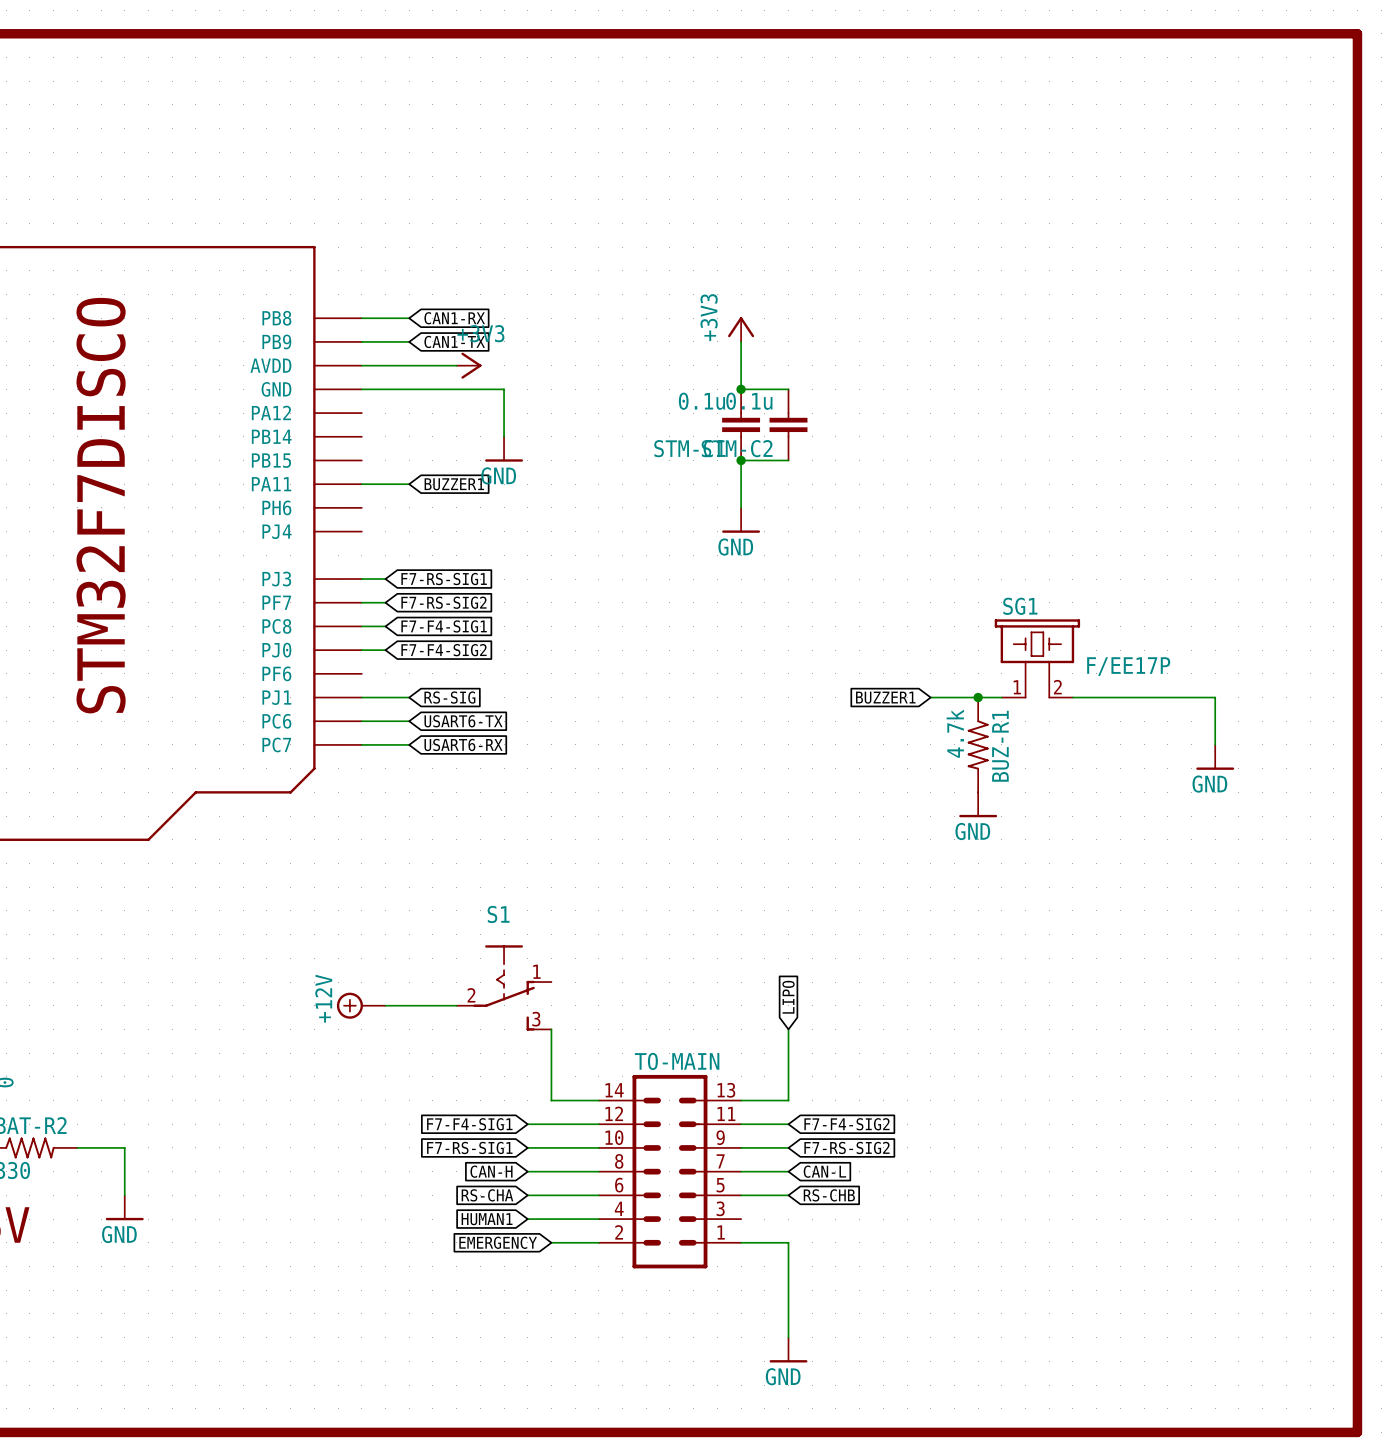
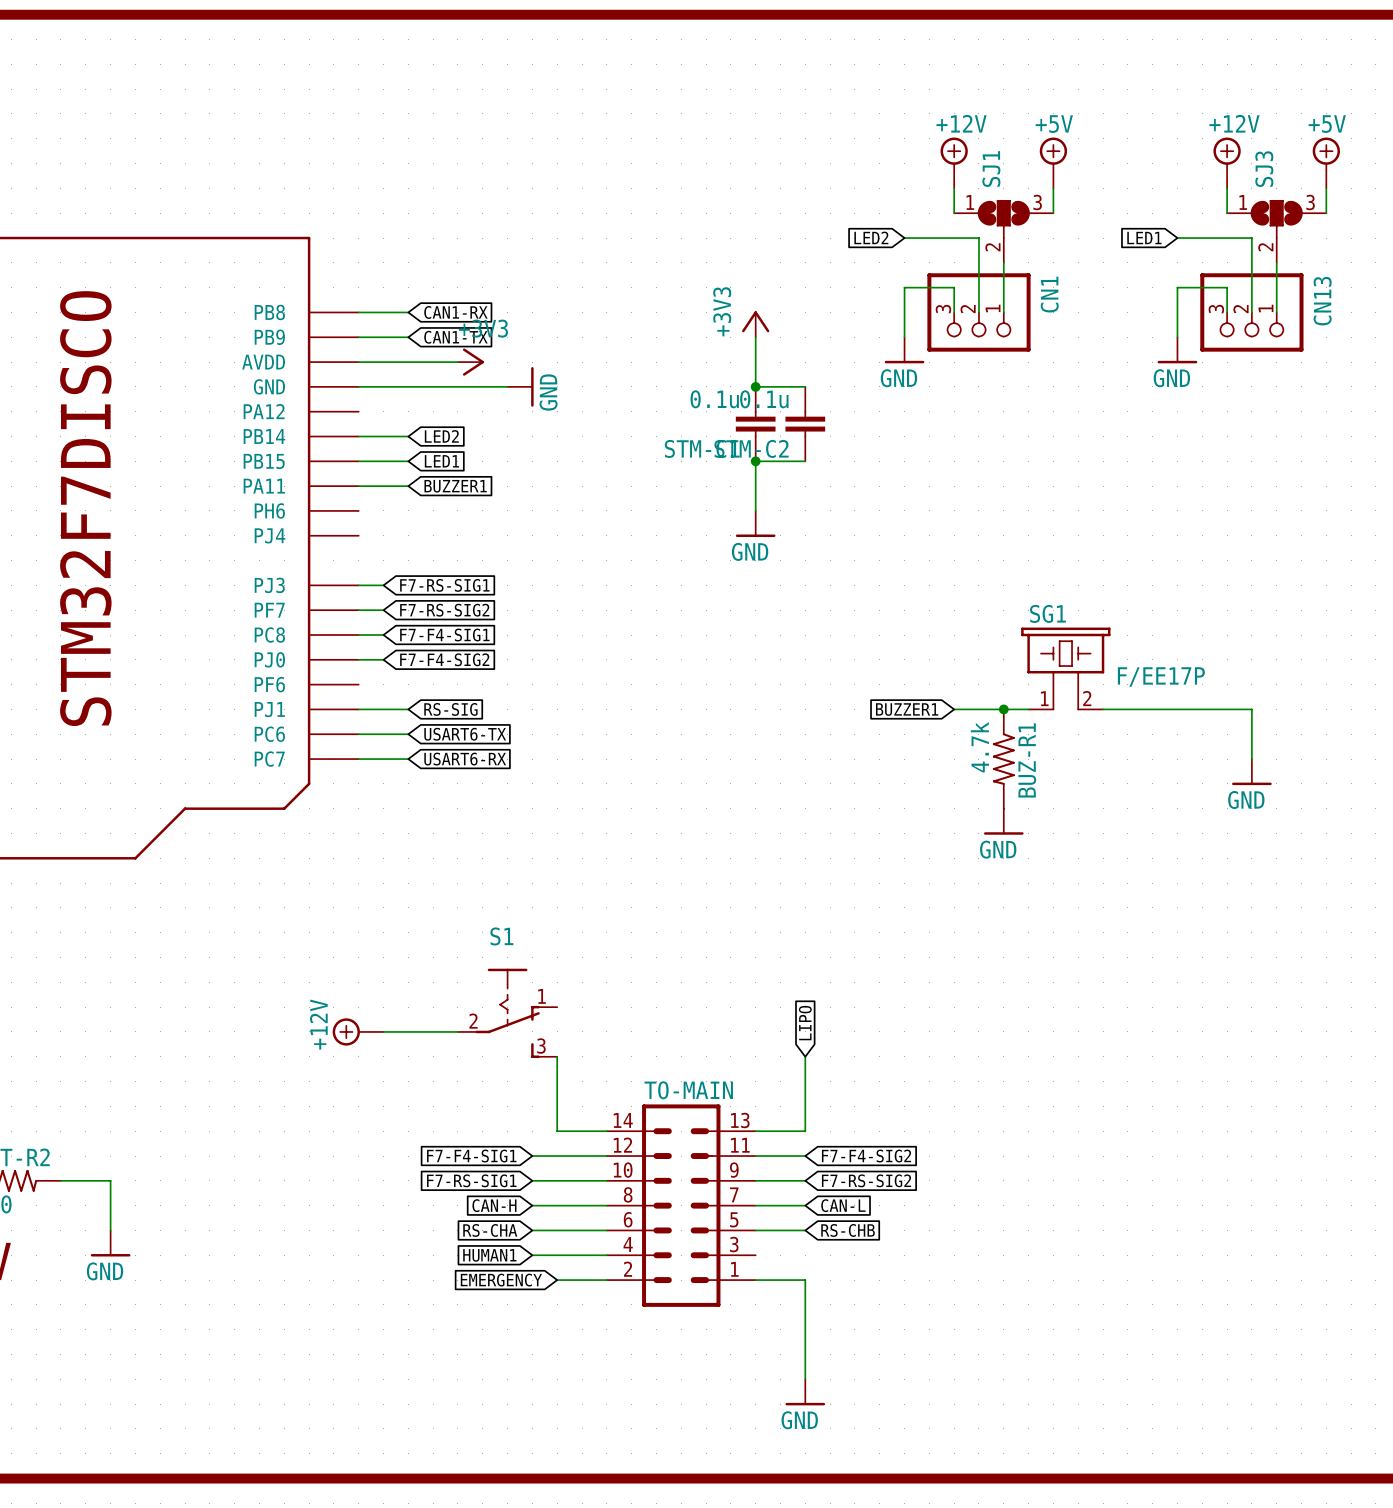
power symbol: none -> +12V (954, 162)
power symbol: none -> +5V (1053, 162)
power symbol: none -> +12V (1227, 162)
power symbol: none -> +5V (1326, 162)
wire: none -> (954, 188) (954, 213)
wire: none -> (1053, 188) (1053, 213)
wire: none -> (1227, 188) (1227, 213)
wire: none -> (1326, 188) (1326, 213)
SJ1: none -> (1003, 231)
SJ3: none -> (1276, 231)
global label: none -> LED2 (871, 237)
wire: none -> (904, 238) (978, 238) (978, 312)
global label: none -> LED1 (1144, 238)
wire: none -> (1177, 238) (1251, 238) (1251, 312)
wire: none -> (1003, 262) (1003, 312)
wire: none -> (1276, 262) (1276, 312)
wire: none -> (954, 312) (954, 287) (904, 287) (904, 337)
CN1: none -> (978, 312)
wire: none -> (1227, 312) (1227, 287) (1177, 287) (1177, 337)
CN13: none -> (1251, 312)
power symbol: none -> GND (904, 350)
power symbol: none -> GND (1177, 350)
wire: (504, 389) (504, 436) -> none
wire: none -> (358, 436) (408, 436)
global label: none -> LED2 (441, 436)
power symbol position: GND (504, 449) -> GND (520, 386)
wire: none -> (358, 461) (408, 461)
global label: none -> LED1 (441, 461)
power symbol rotation: 0° (504, 460) -> 90° counterclockwise (532, 386)

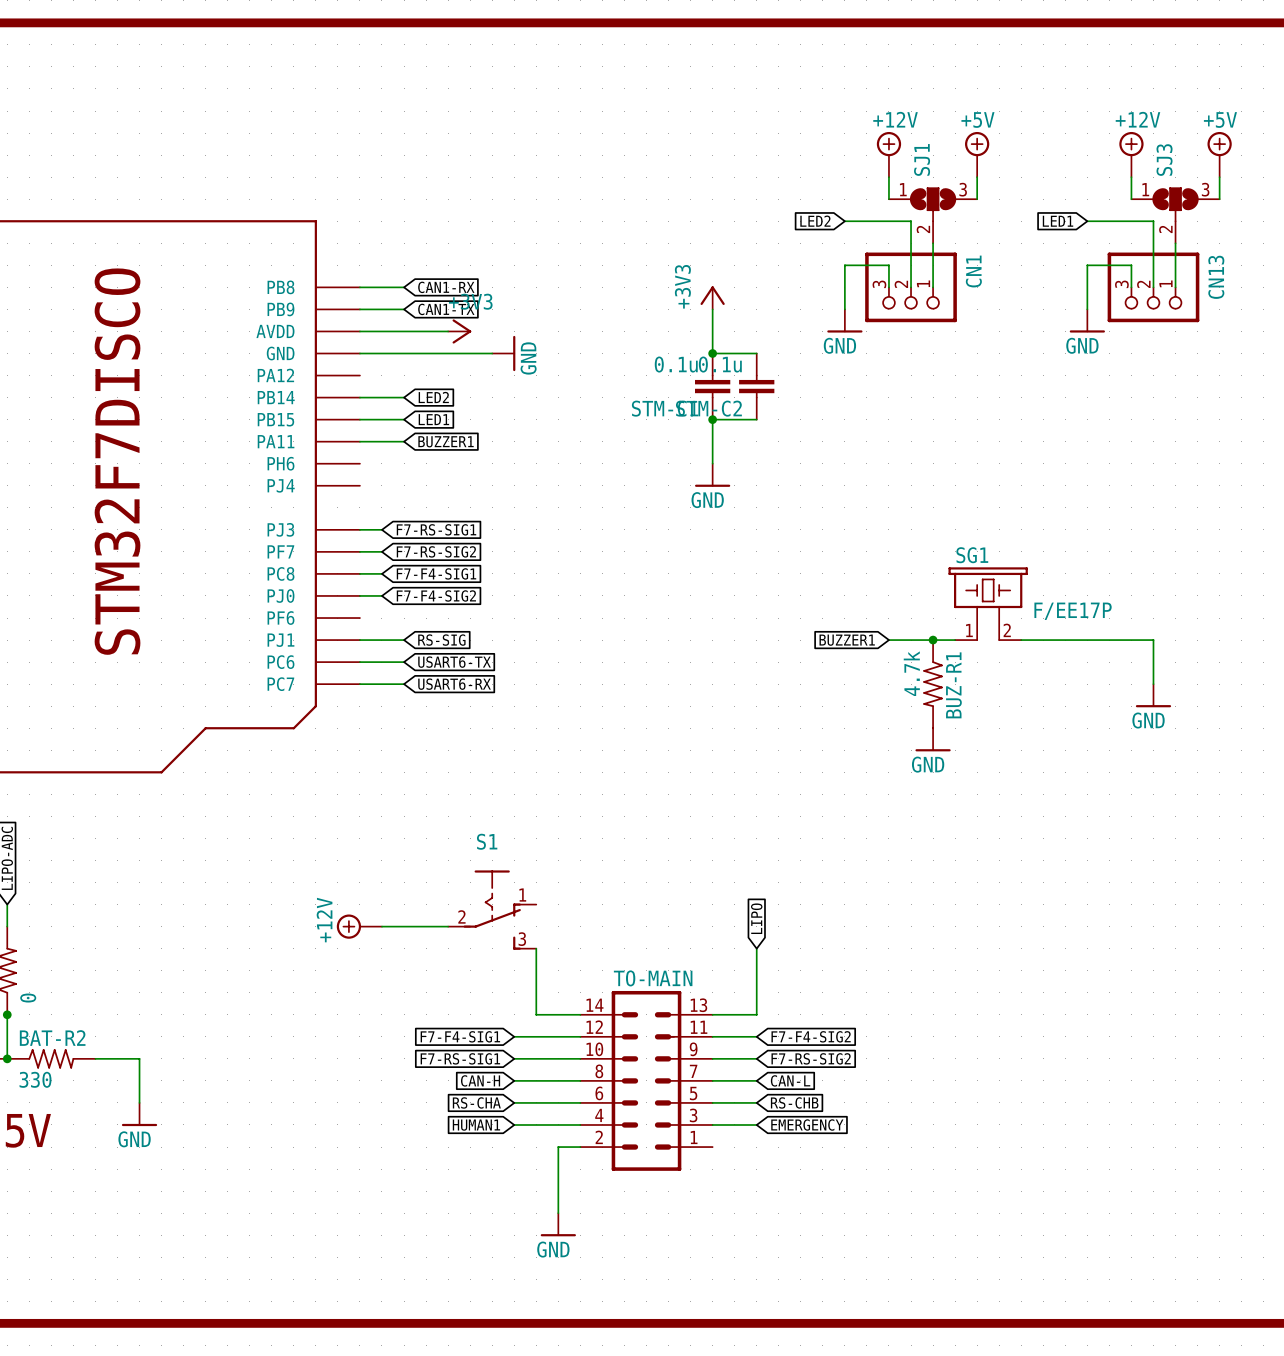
wire: none -> (712, 1124) (756, 1124)
global label: none -> EMERGENCY (807, 1125)
global label: EMERGENCY (501, 1280) -> none
wire: (557, 1280) (582, 1280) -> (558, 1213) (558, 1147)
wire: (755, 1280) (805, 1280) (805, 1379) -> none
power symbol position: GND (805, 1392) -> GND (558, 1224)

